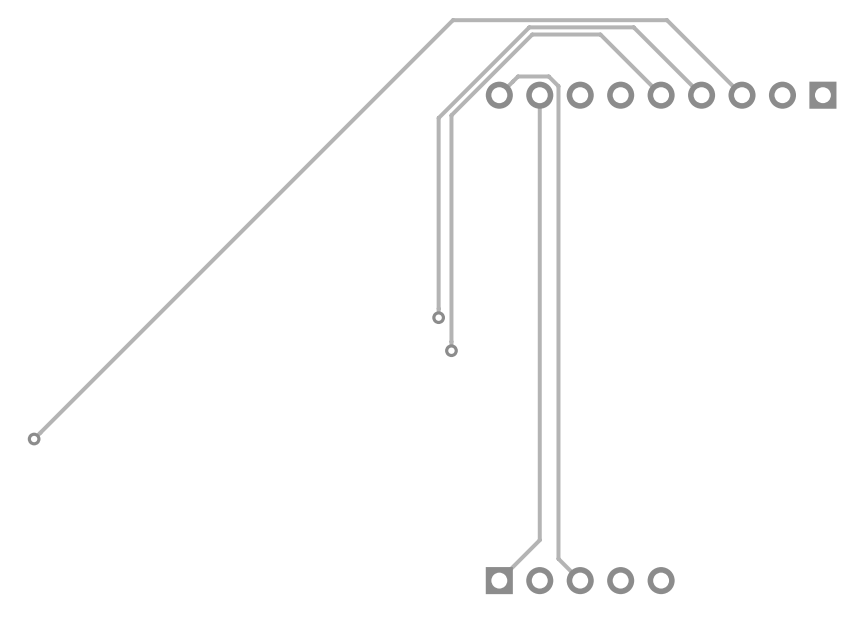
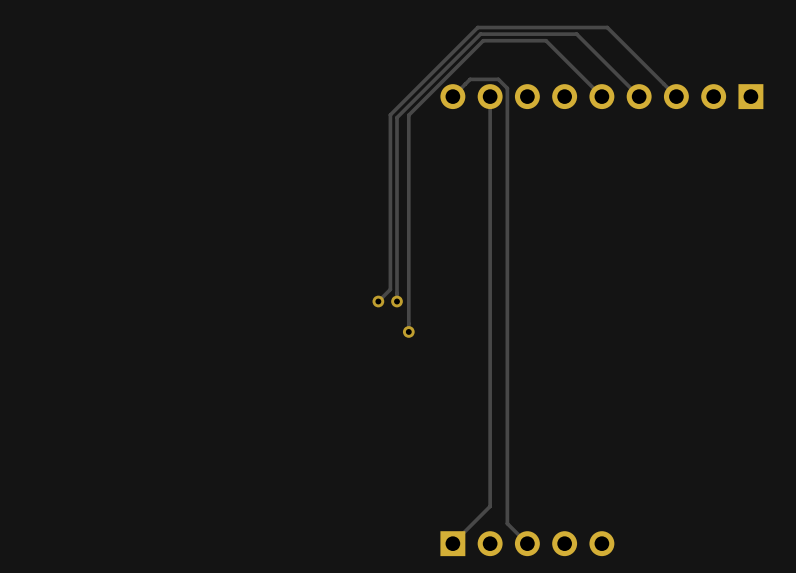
track: (526, 20) (452, 20) (34, 439) -> (477, 27) (390, 114) (390, 289) (378, 301)
via: none -> (378, 301)
via: (34, 439) -> none

